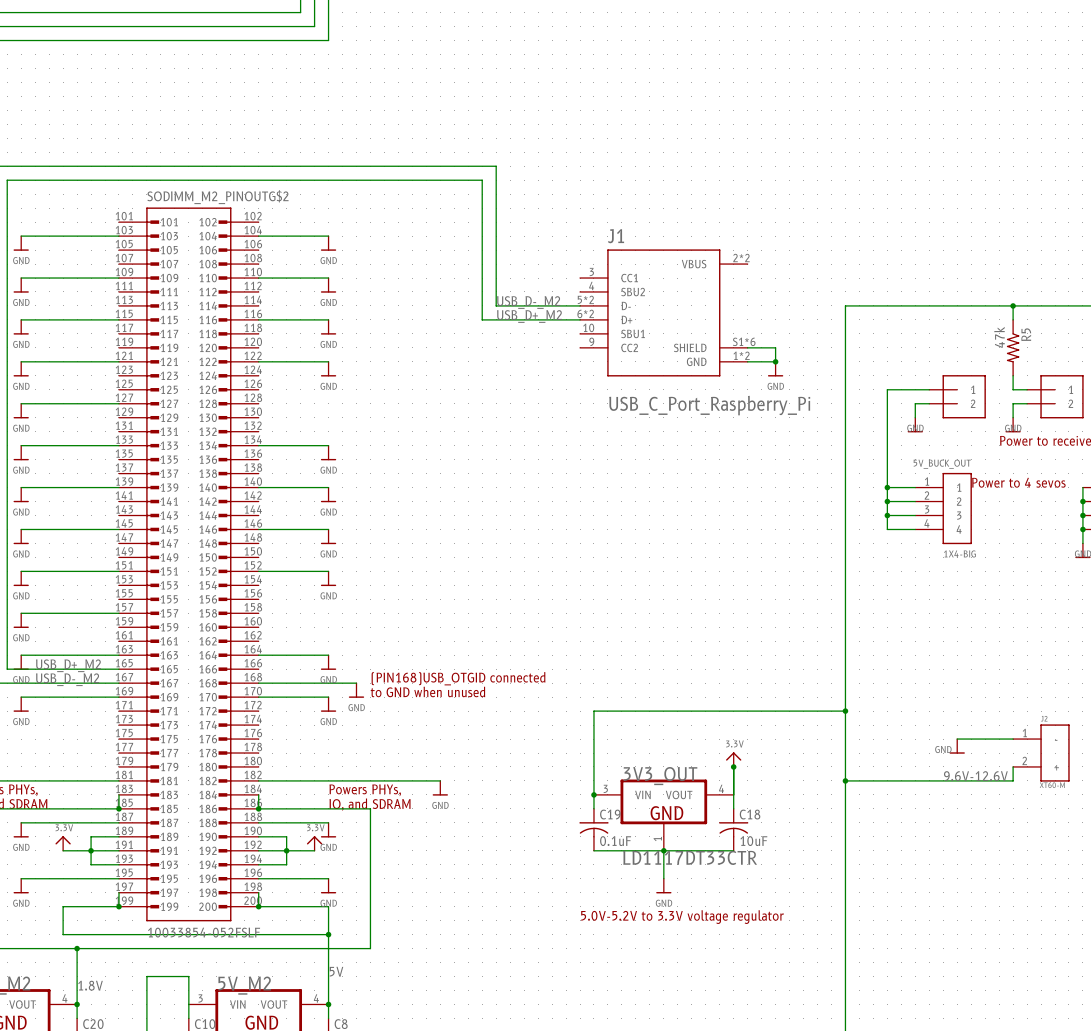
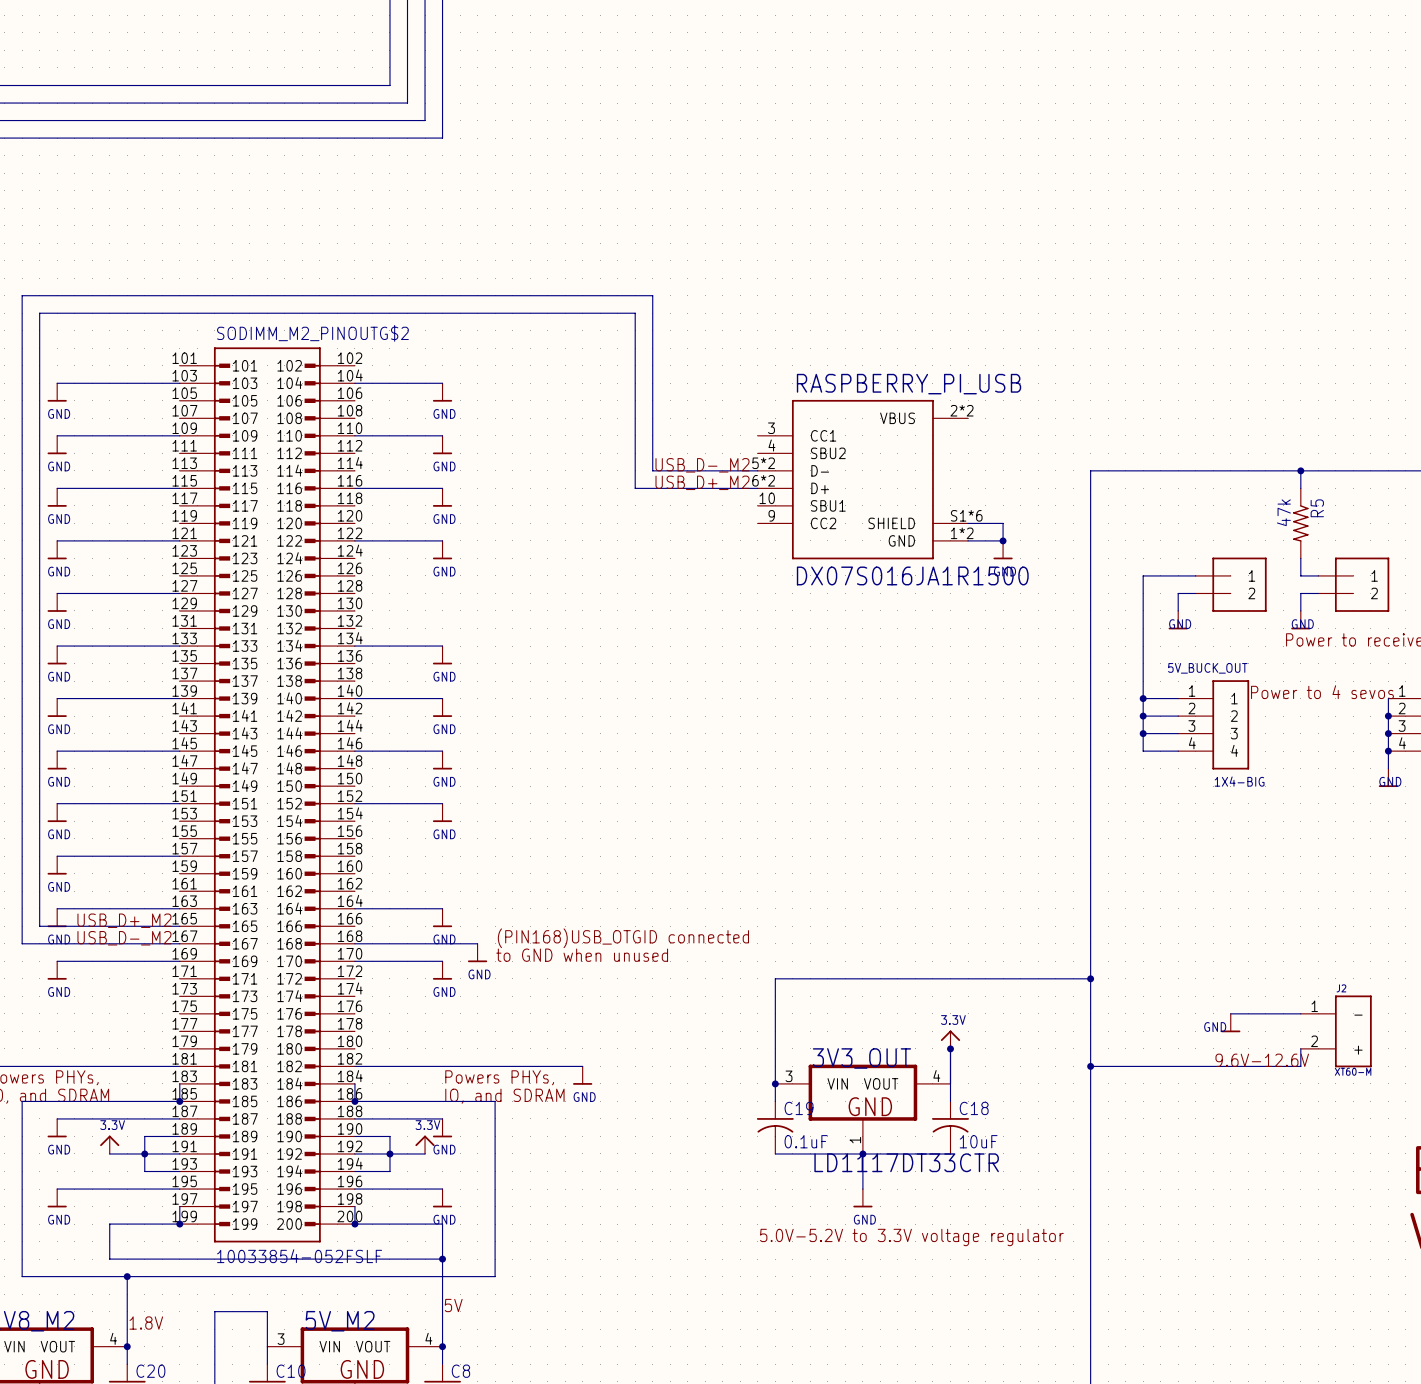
J1 name: J1 (616, 236) -> RASPBERRY_PI_USB (909, 384)
J1 value: USB_C_Port_Raspberry_Pi (709, 405) -> DX07S016JA1R1500 (912, 575)

